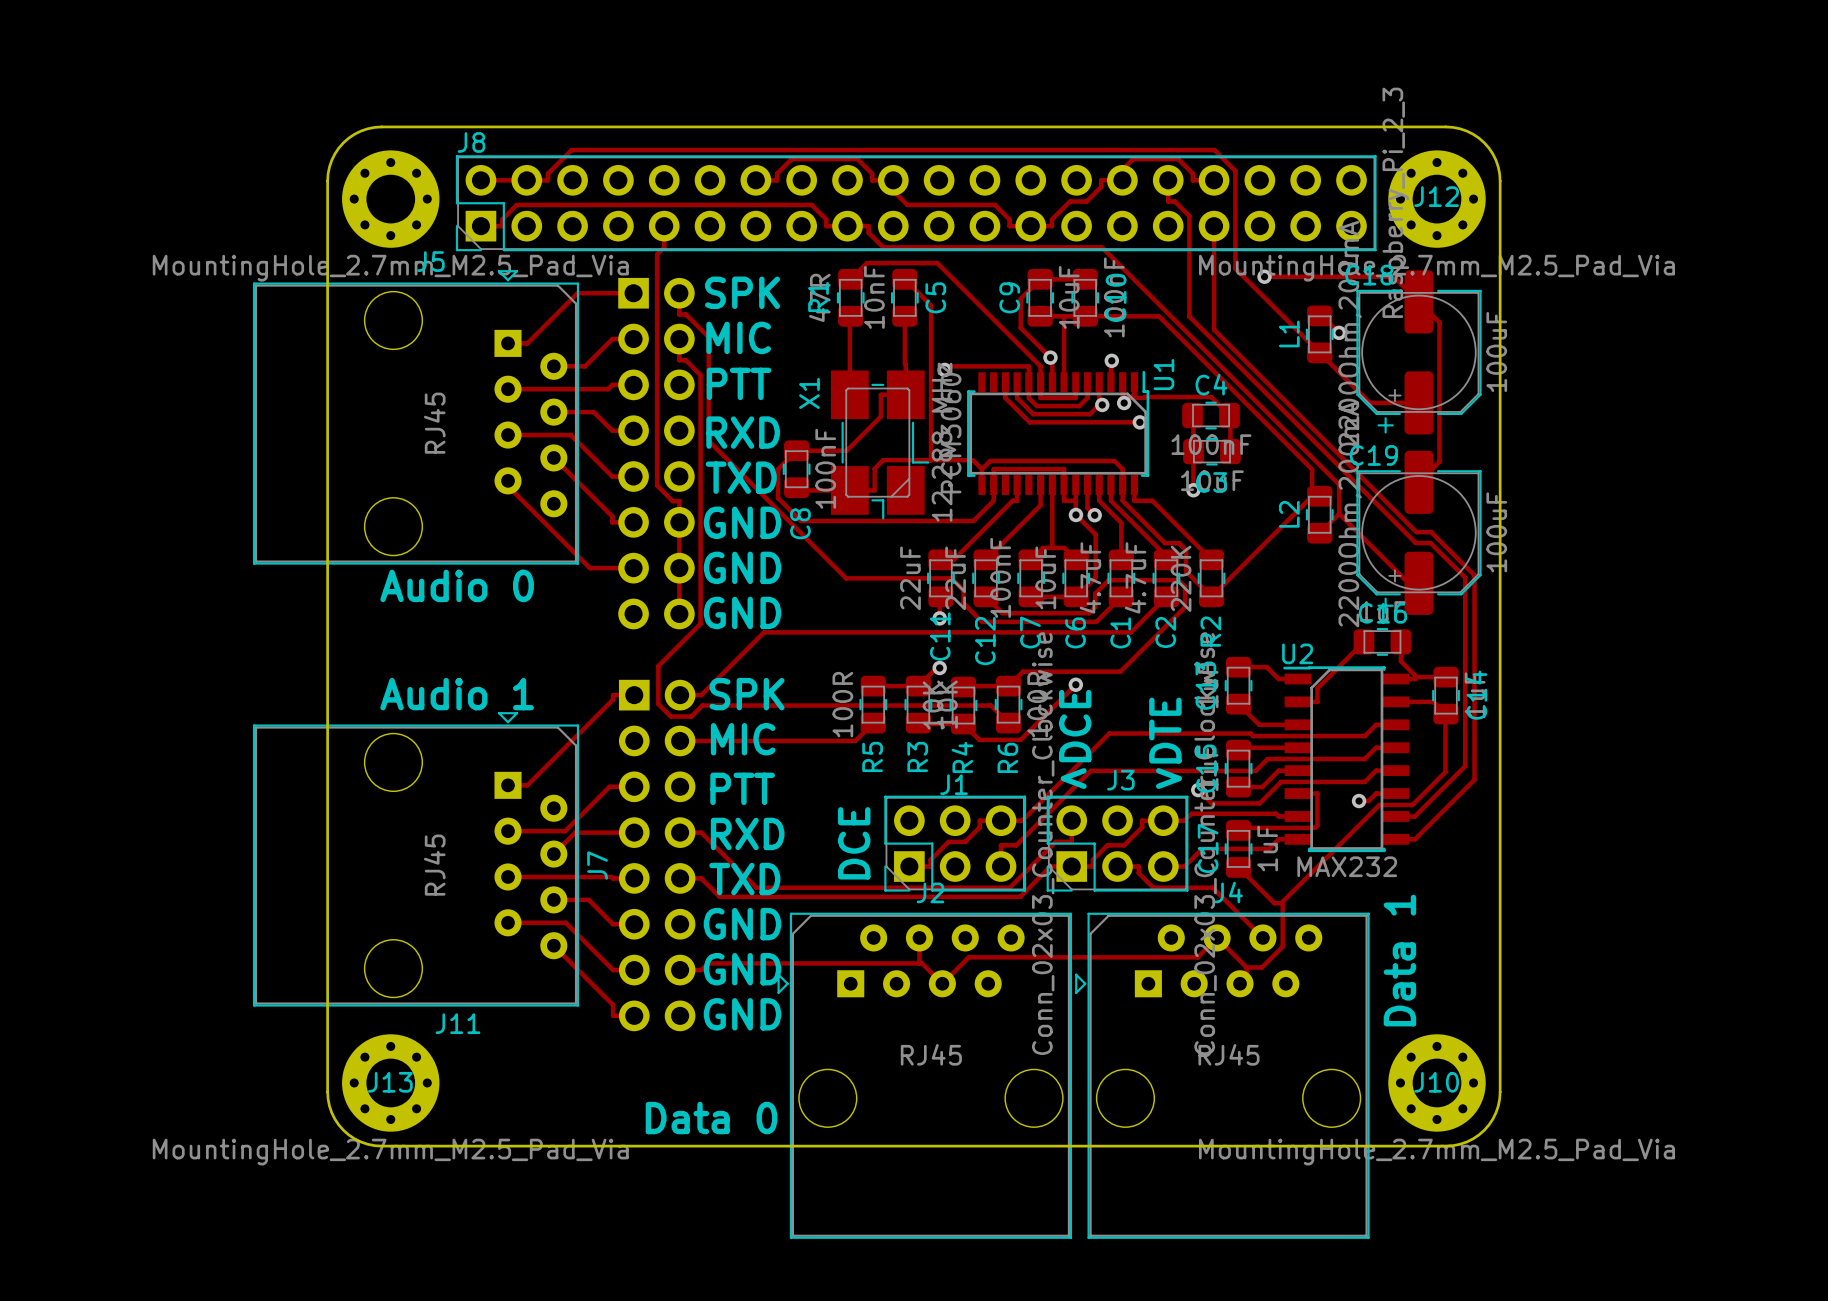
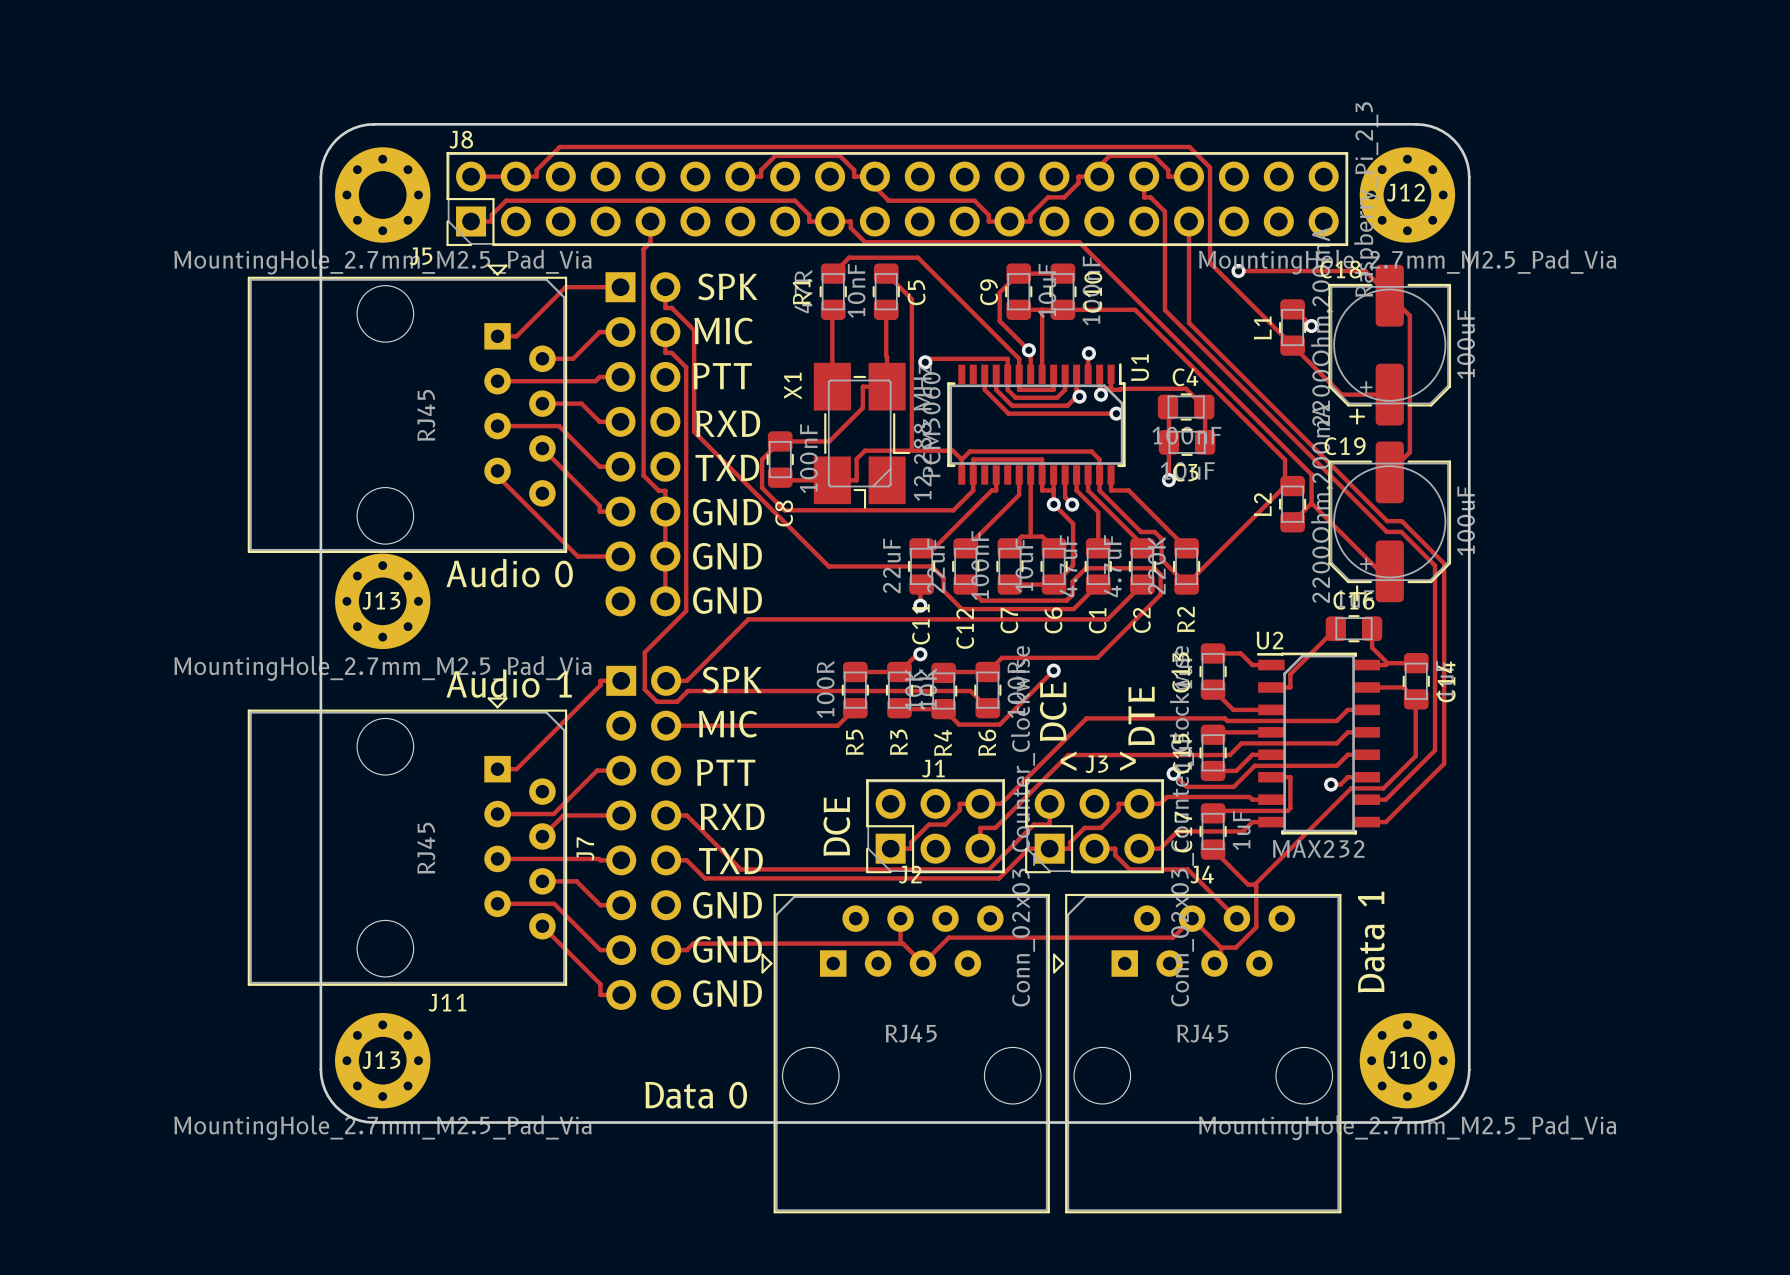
text position: Audio 0 (457, 585) -> Audio 0 (509, 573)
J13: none -> MountingHole_2.7mm_M2.5_Pad_Via (382, 601)
text position: Audio 1 (457, 694) -> Audio 1 (509, 683)

